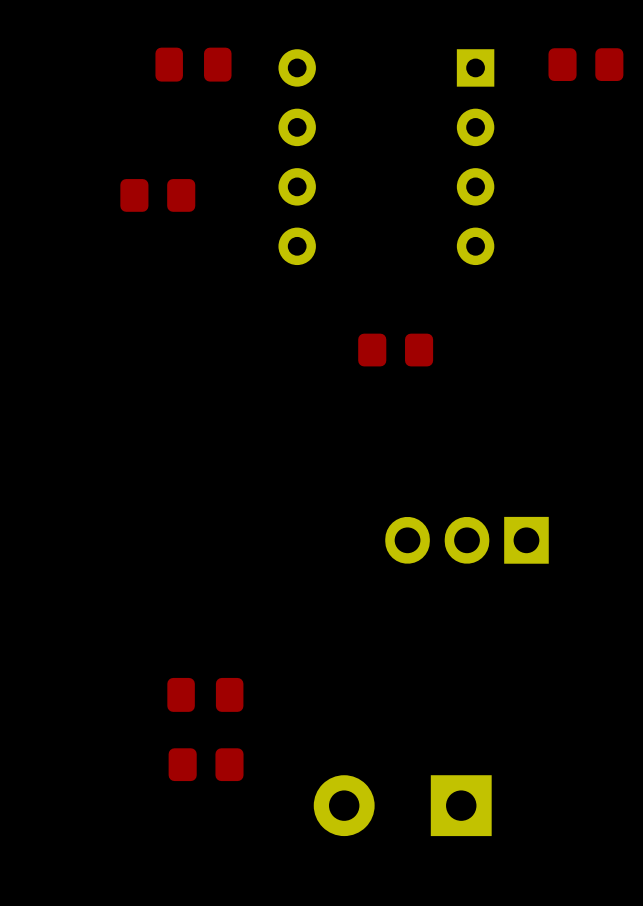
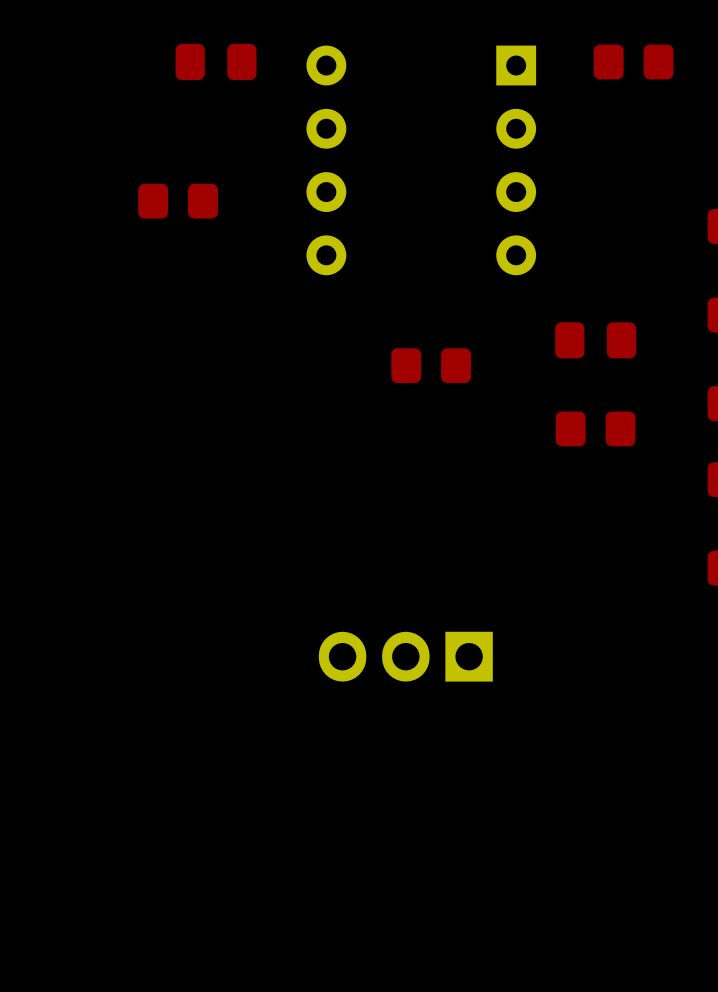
part position: (467, 540) -> (405, 656)
part position: (205, 694) -> (595, 340)
part position: (206, 764) -> (595, 428)
part: (402, 805) -> none

